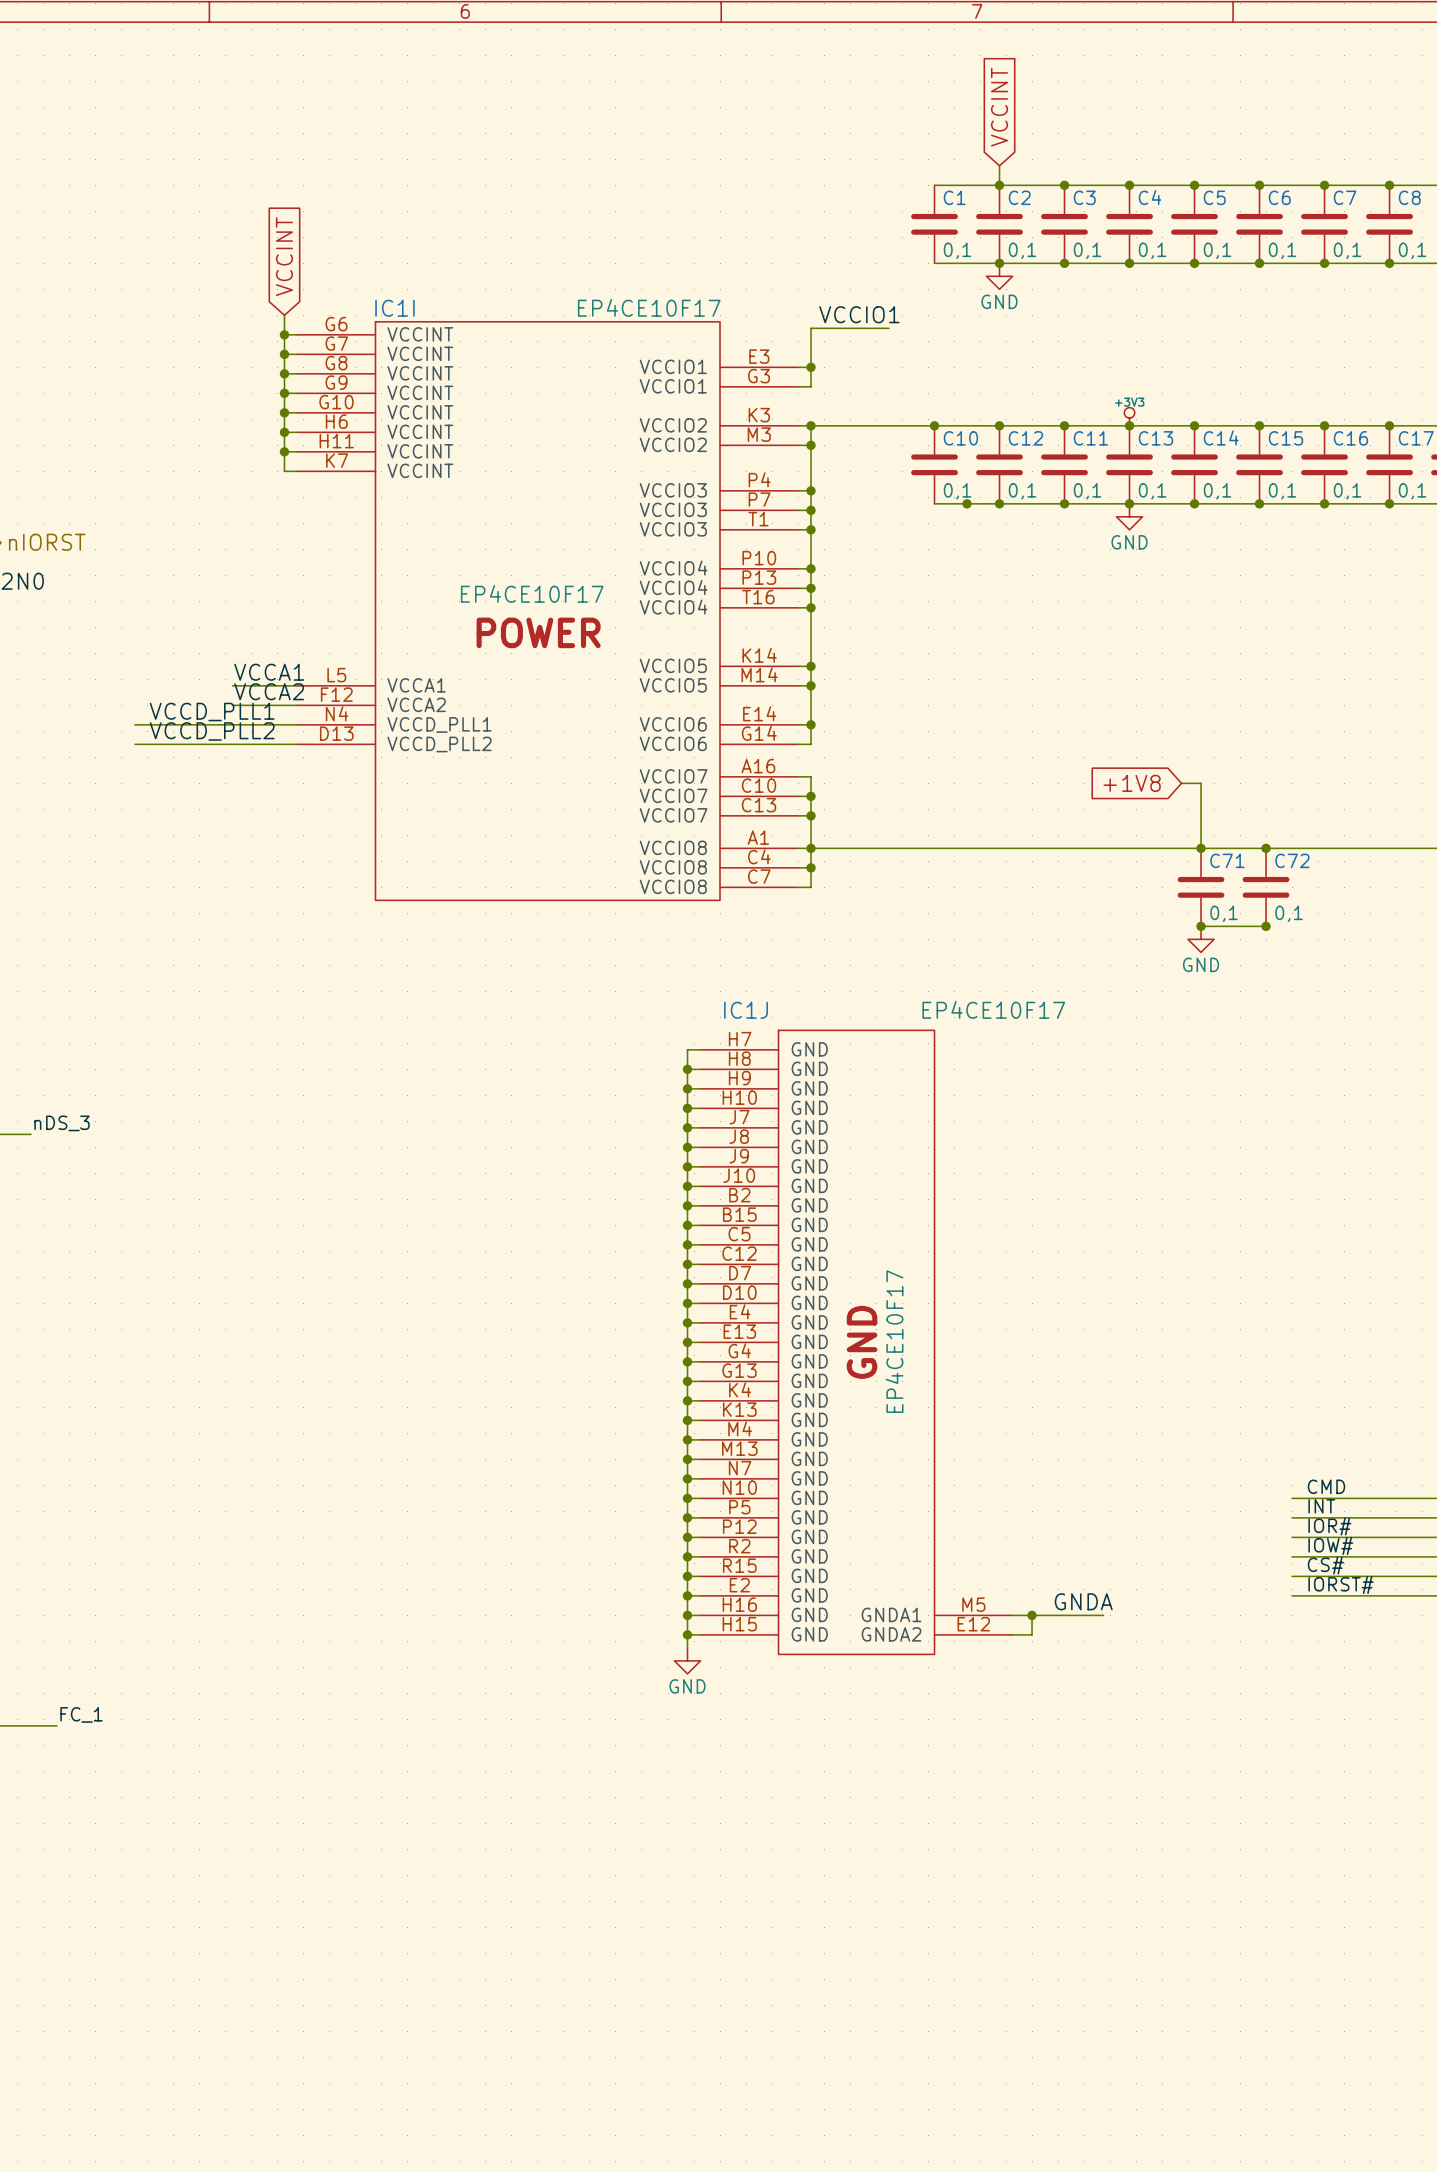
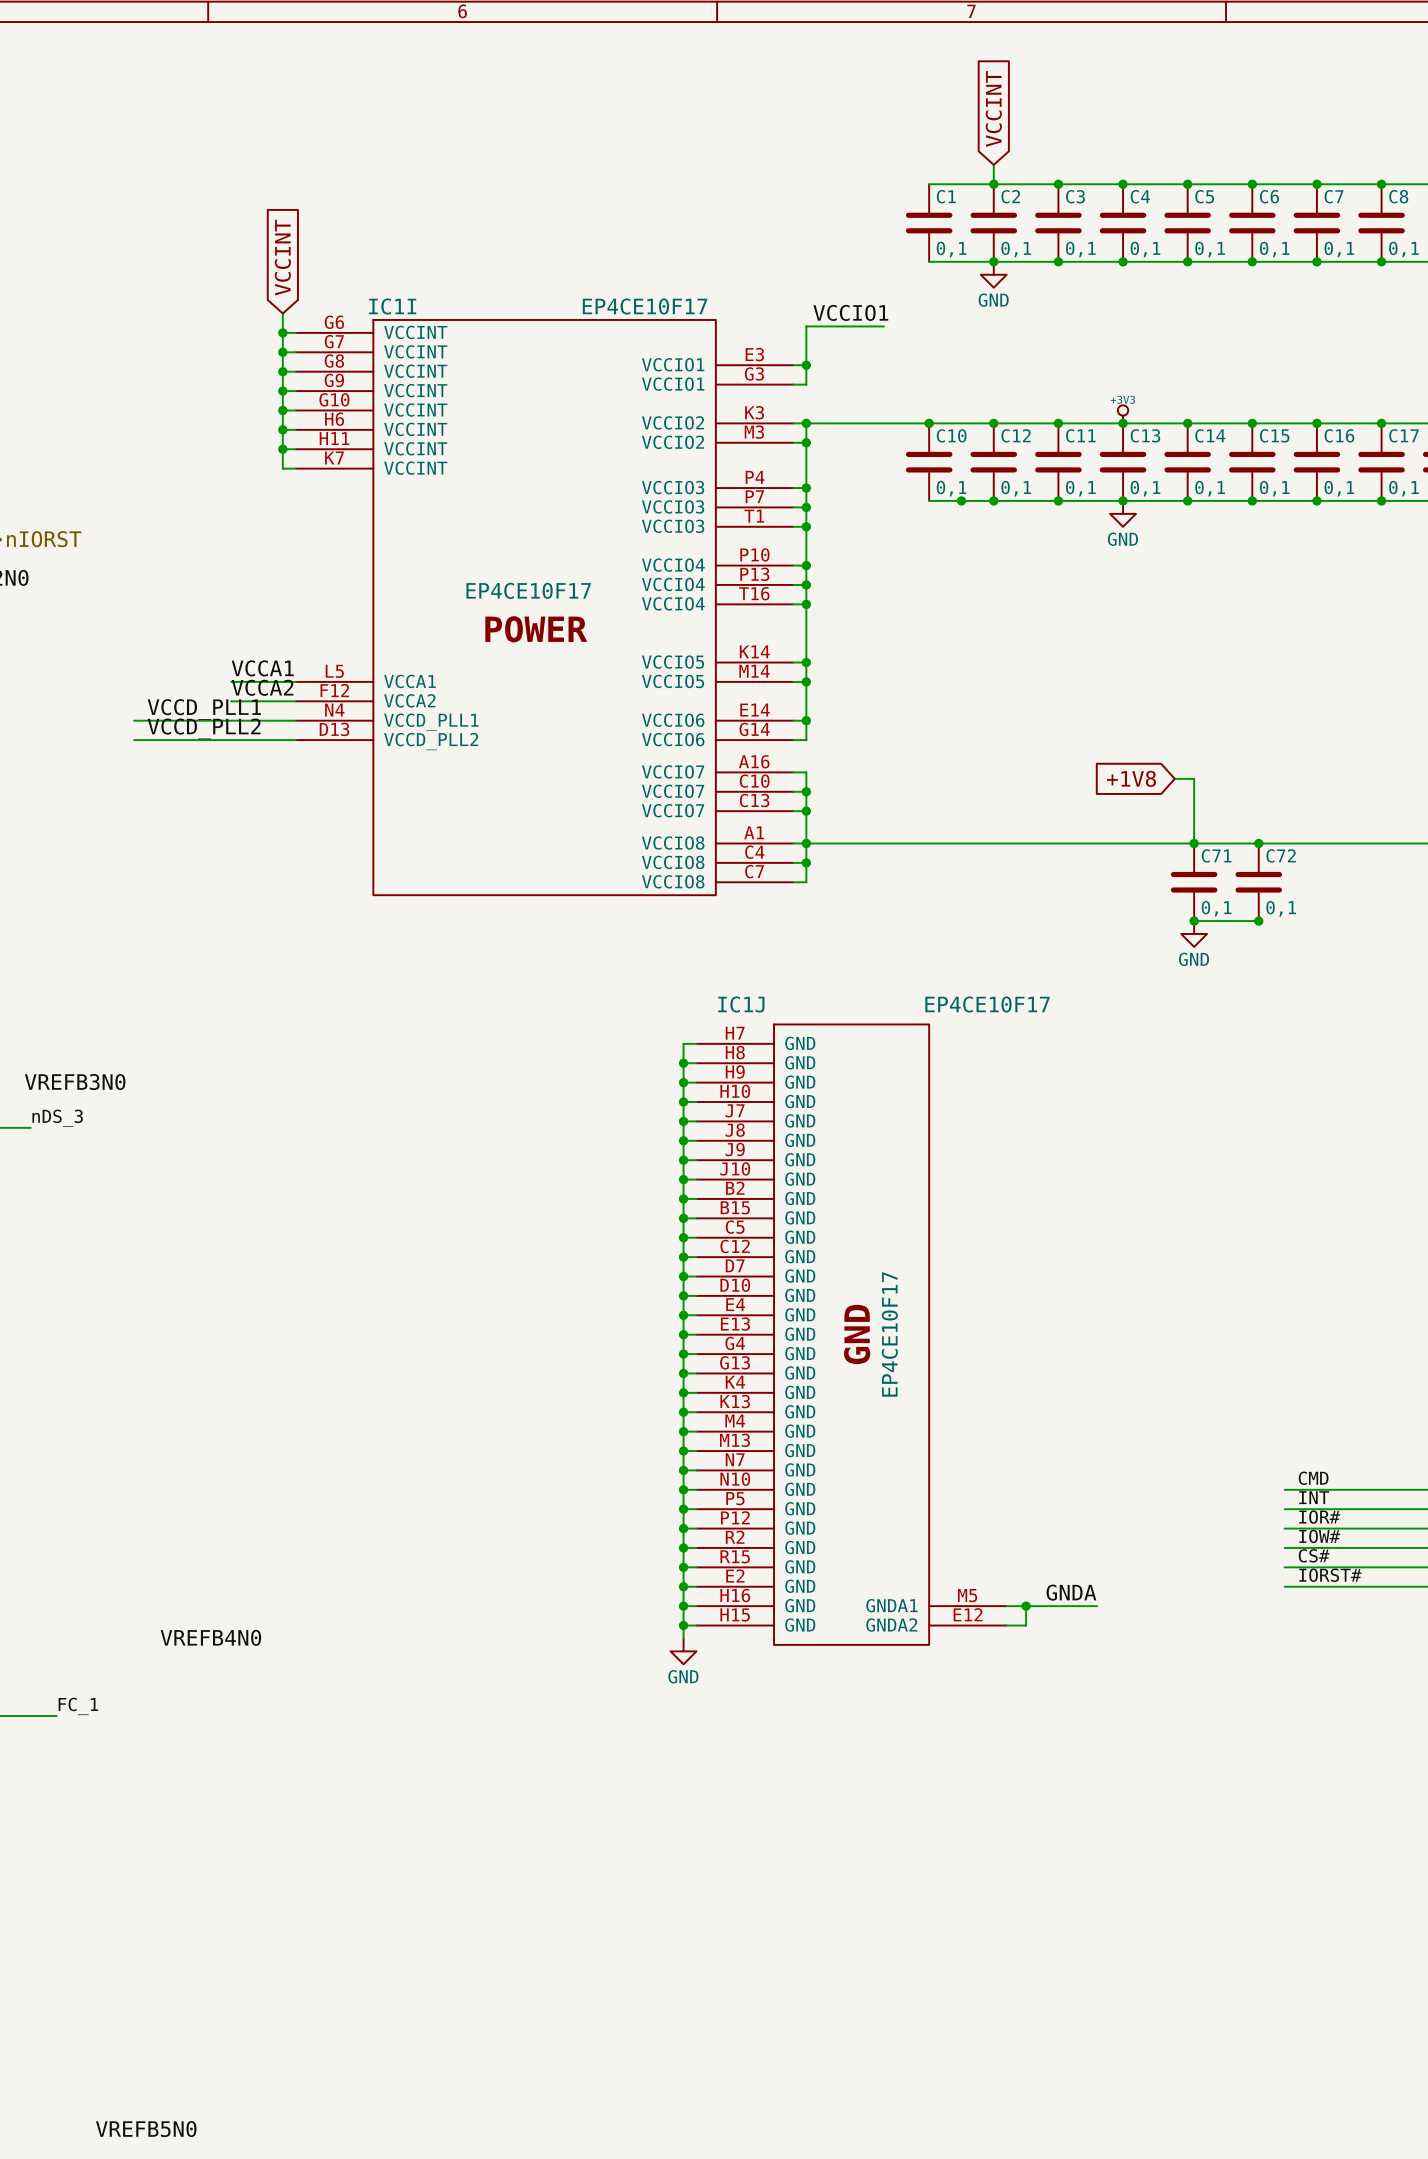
label: none -> VREFB3N0 (75, 1082)
label: none -> VREFB4N0 (210, 1637)
label: none -> VREFB5N0 (146, 2129)

